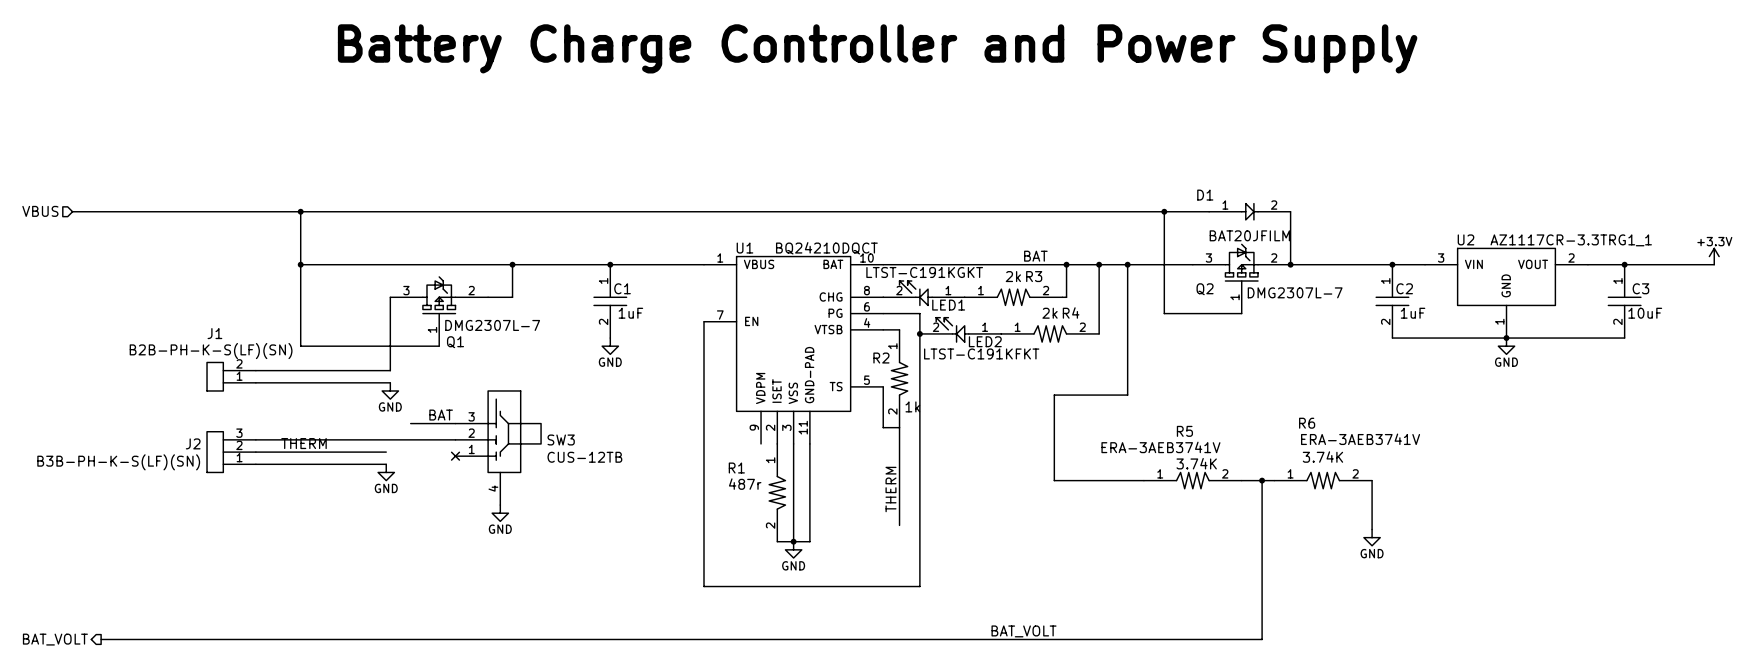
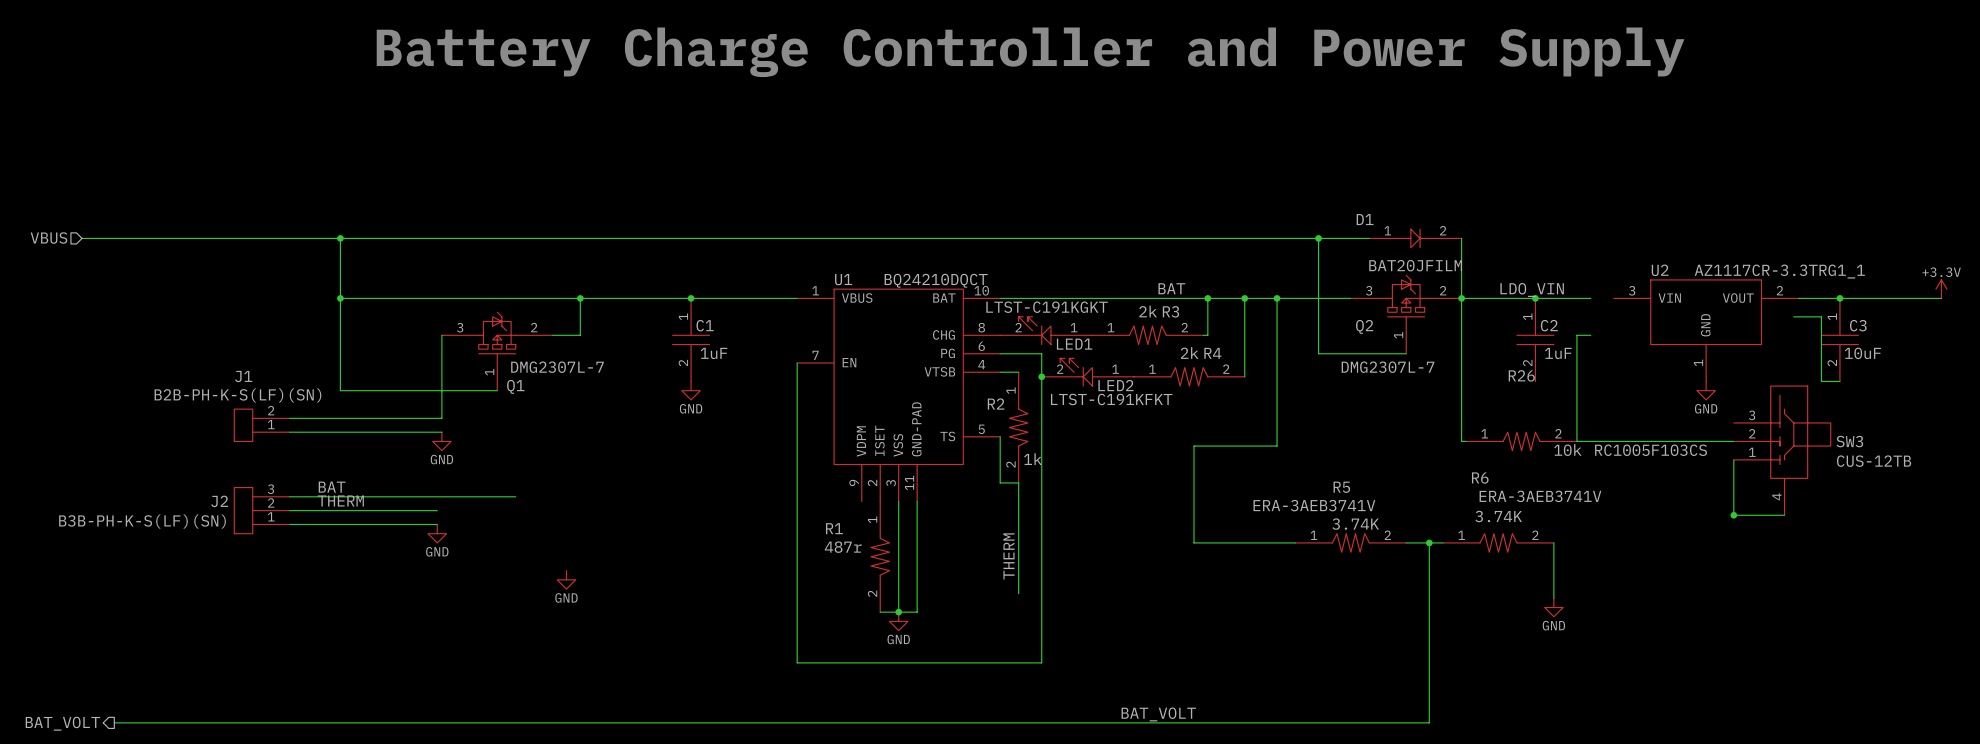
label: none -> LDO_VIN (1532, 289)
wire: none -> (1461, 298) (1461, 441) (1466, 441)
junction position: (1392, 264) -> (1535, 298)
wire: (1404, 264) (1425, 264) -> none
Q2 value position: DMG2307L-7 (1295, 292) -> DMG2307L-7 (1387, 367)
wire: none -> (1590, 335) (1576, 335) (1576, 441) (1733, 441)
C2 position: (1392, 301) -> (1535, 339)
wire: (1392, 338) (1608, 338) -> (1793, 316) (1821, 316) (1821, 381)
junction: (1506, 338) -> none
R26: none -> RC1005F103CS (1521, 441)
wire: none -> (1733, 459) (1733, 515) (1784, 515)
label position: BAT (441, 415) -> BAT (332, 487)
wire: (410, 423) (455, 423) -> none
SW3 position: (498, 448) -> (1782, 450)
no-connect mark: (455, 456) -> none
junction: none -> (1733, 515)

